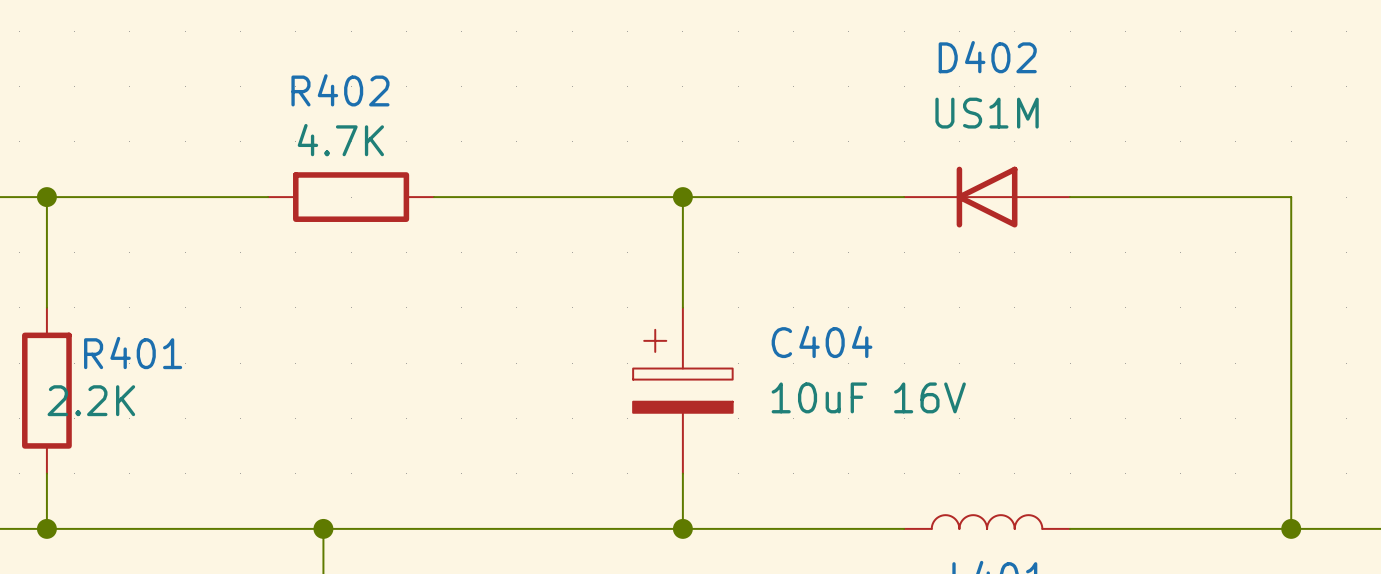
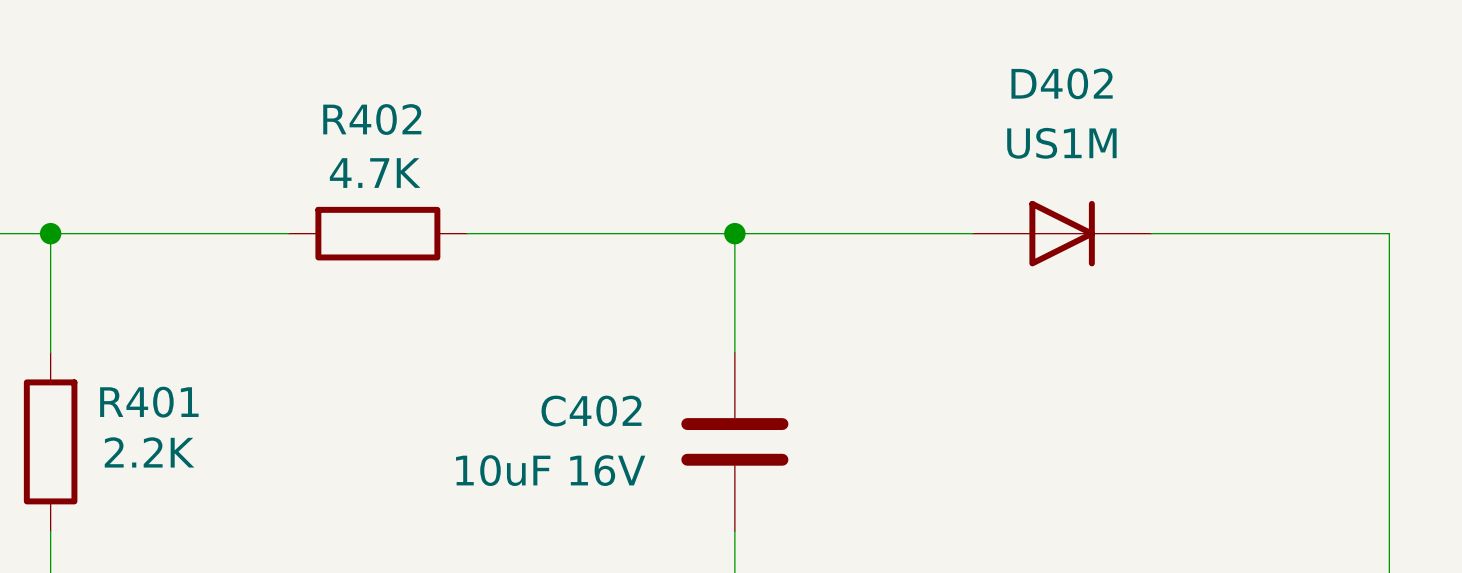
D402 rotation: 0° (987, 197) -> 180° (1062, 233)
C404: 10uF 16V (682, 390) -> none
C402: none -> 10uF 16V (734, 441)
R401 value position: 2.2K (91, 400) -> 2.2K (149, 452)

